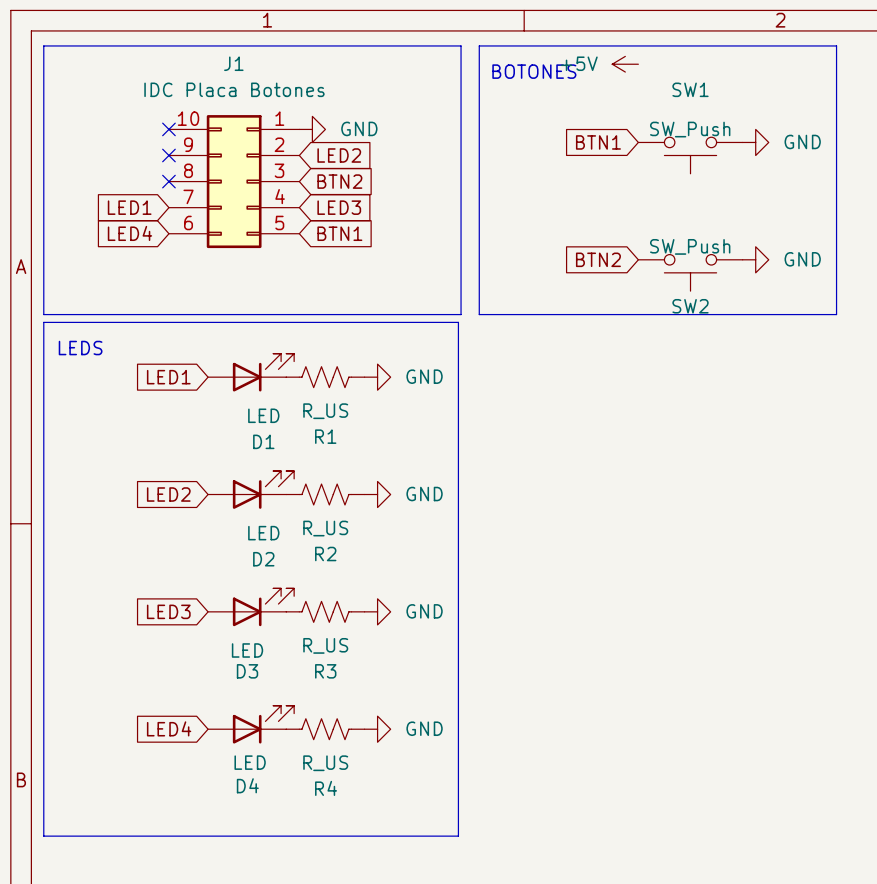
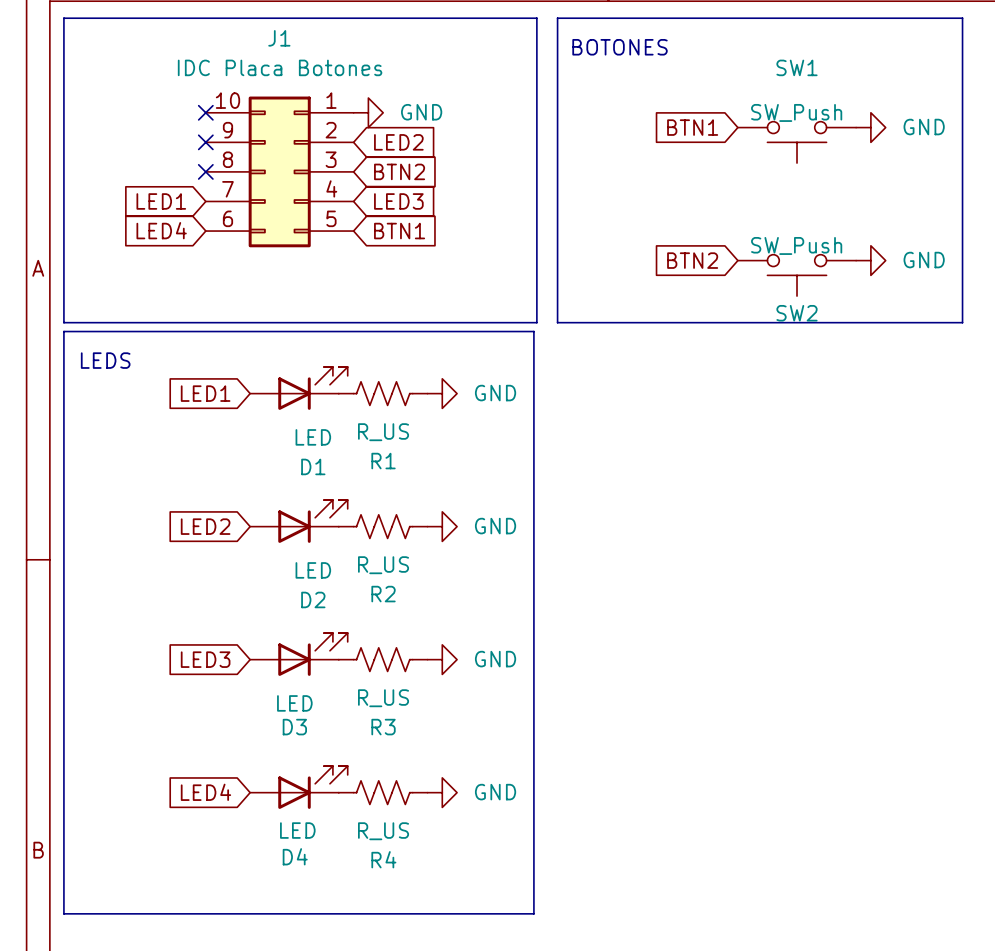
power symbol: +5V (625, 64) -> none

